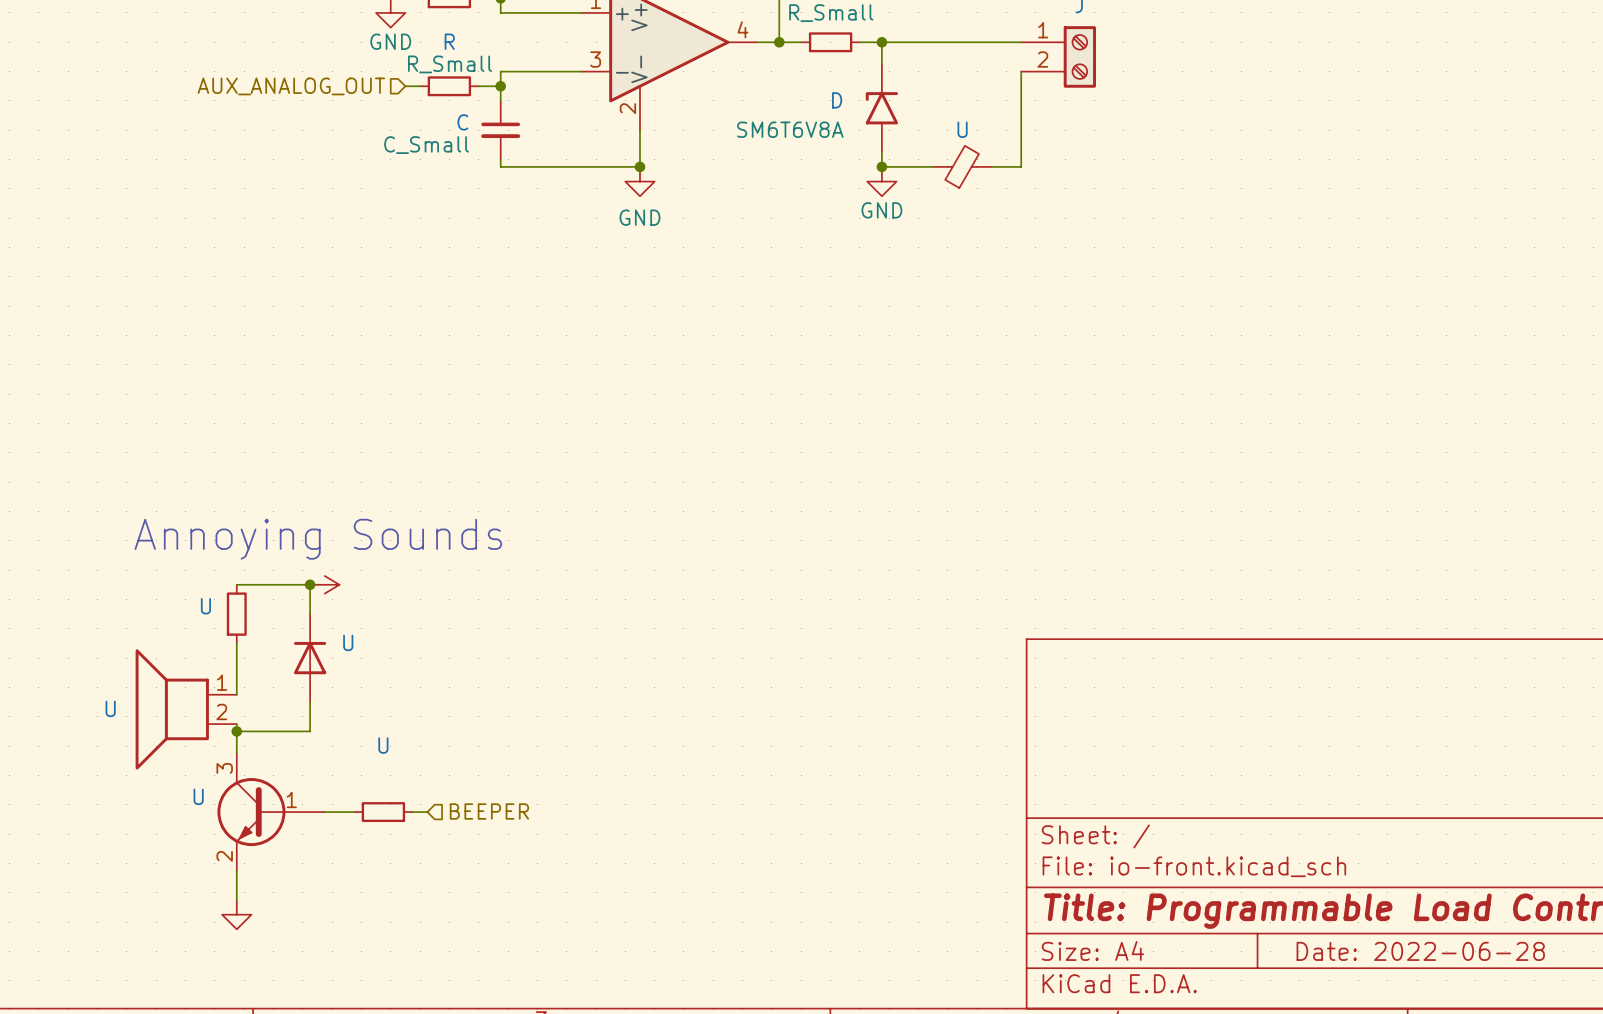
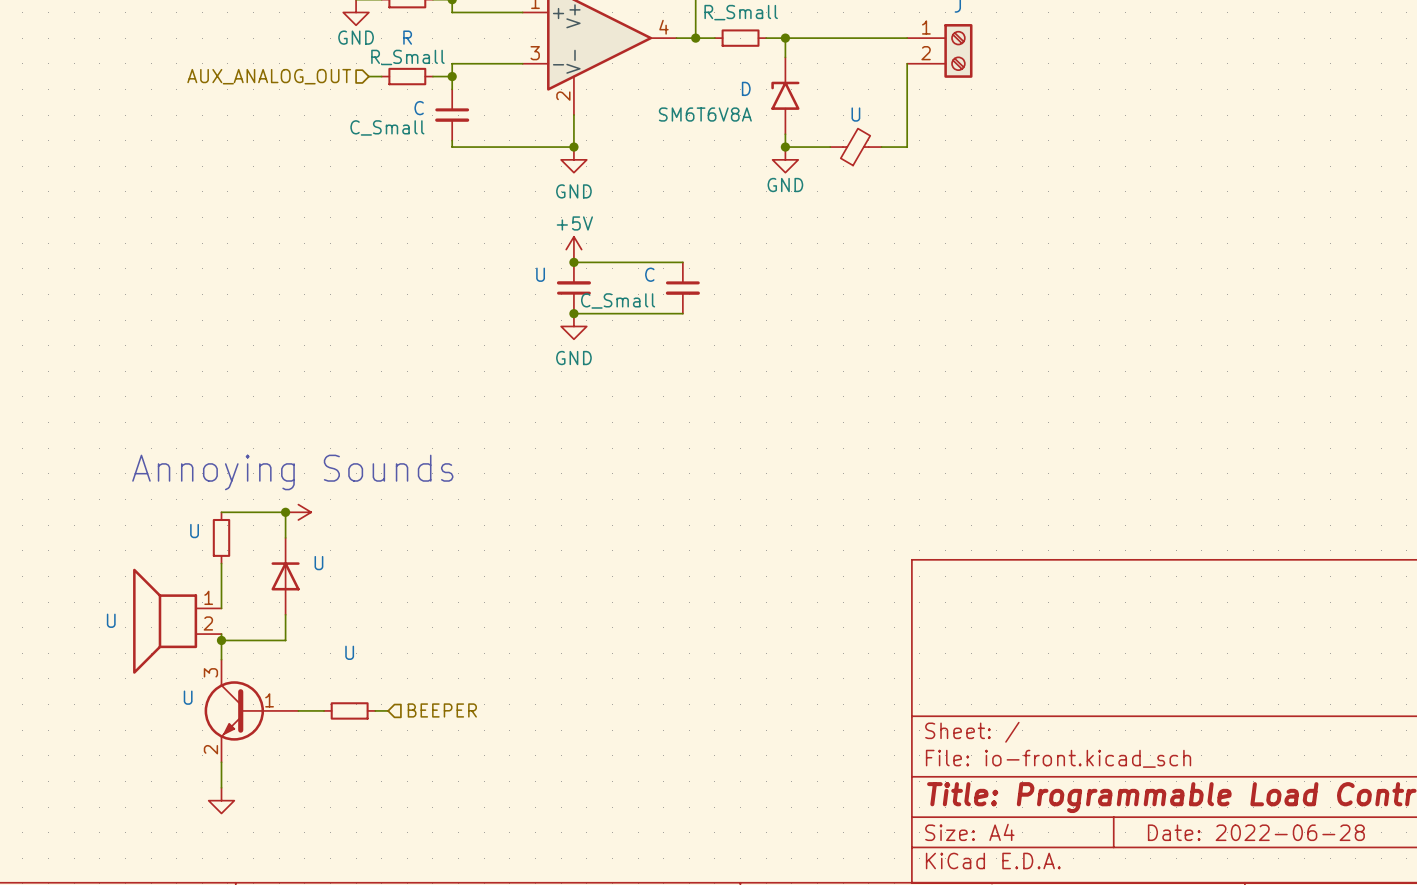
power symbol: none -> +5V (573, 249)
wire: none -> (573, 262) (682, 262)
junction: none -> (573, 262)
U: none -> (573, 288)
C: none -> C_Small (682, 288)
wire: none -> (573, 313) (682, 313)
junction: none -> (573, 313)
power symbol: none -> GND (573, 326)

